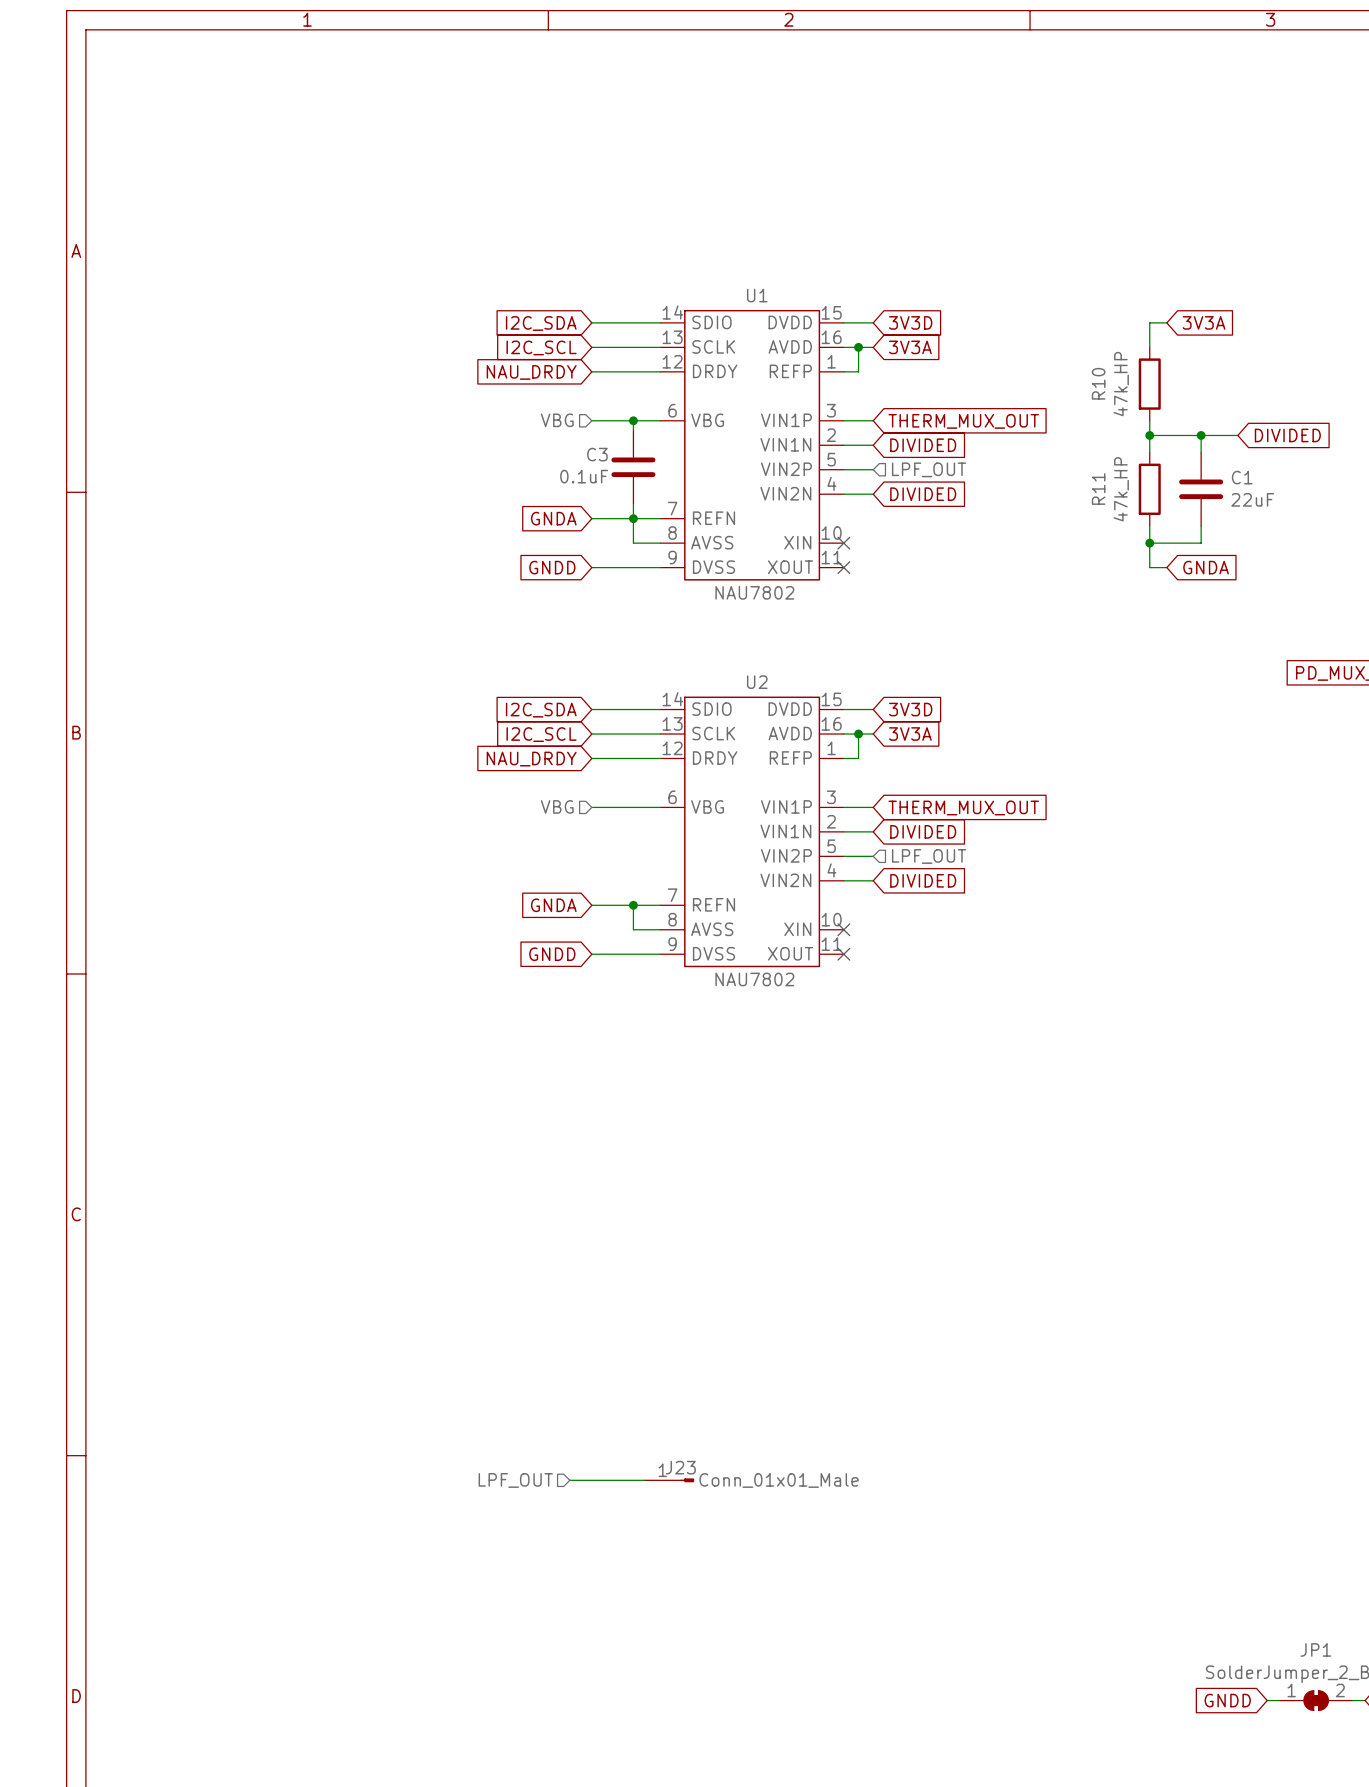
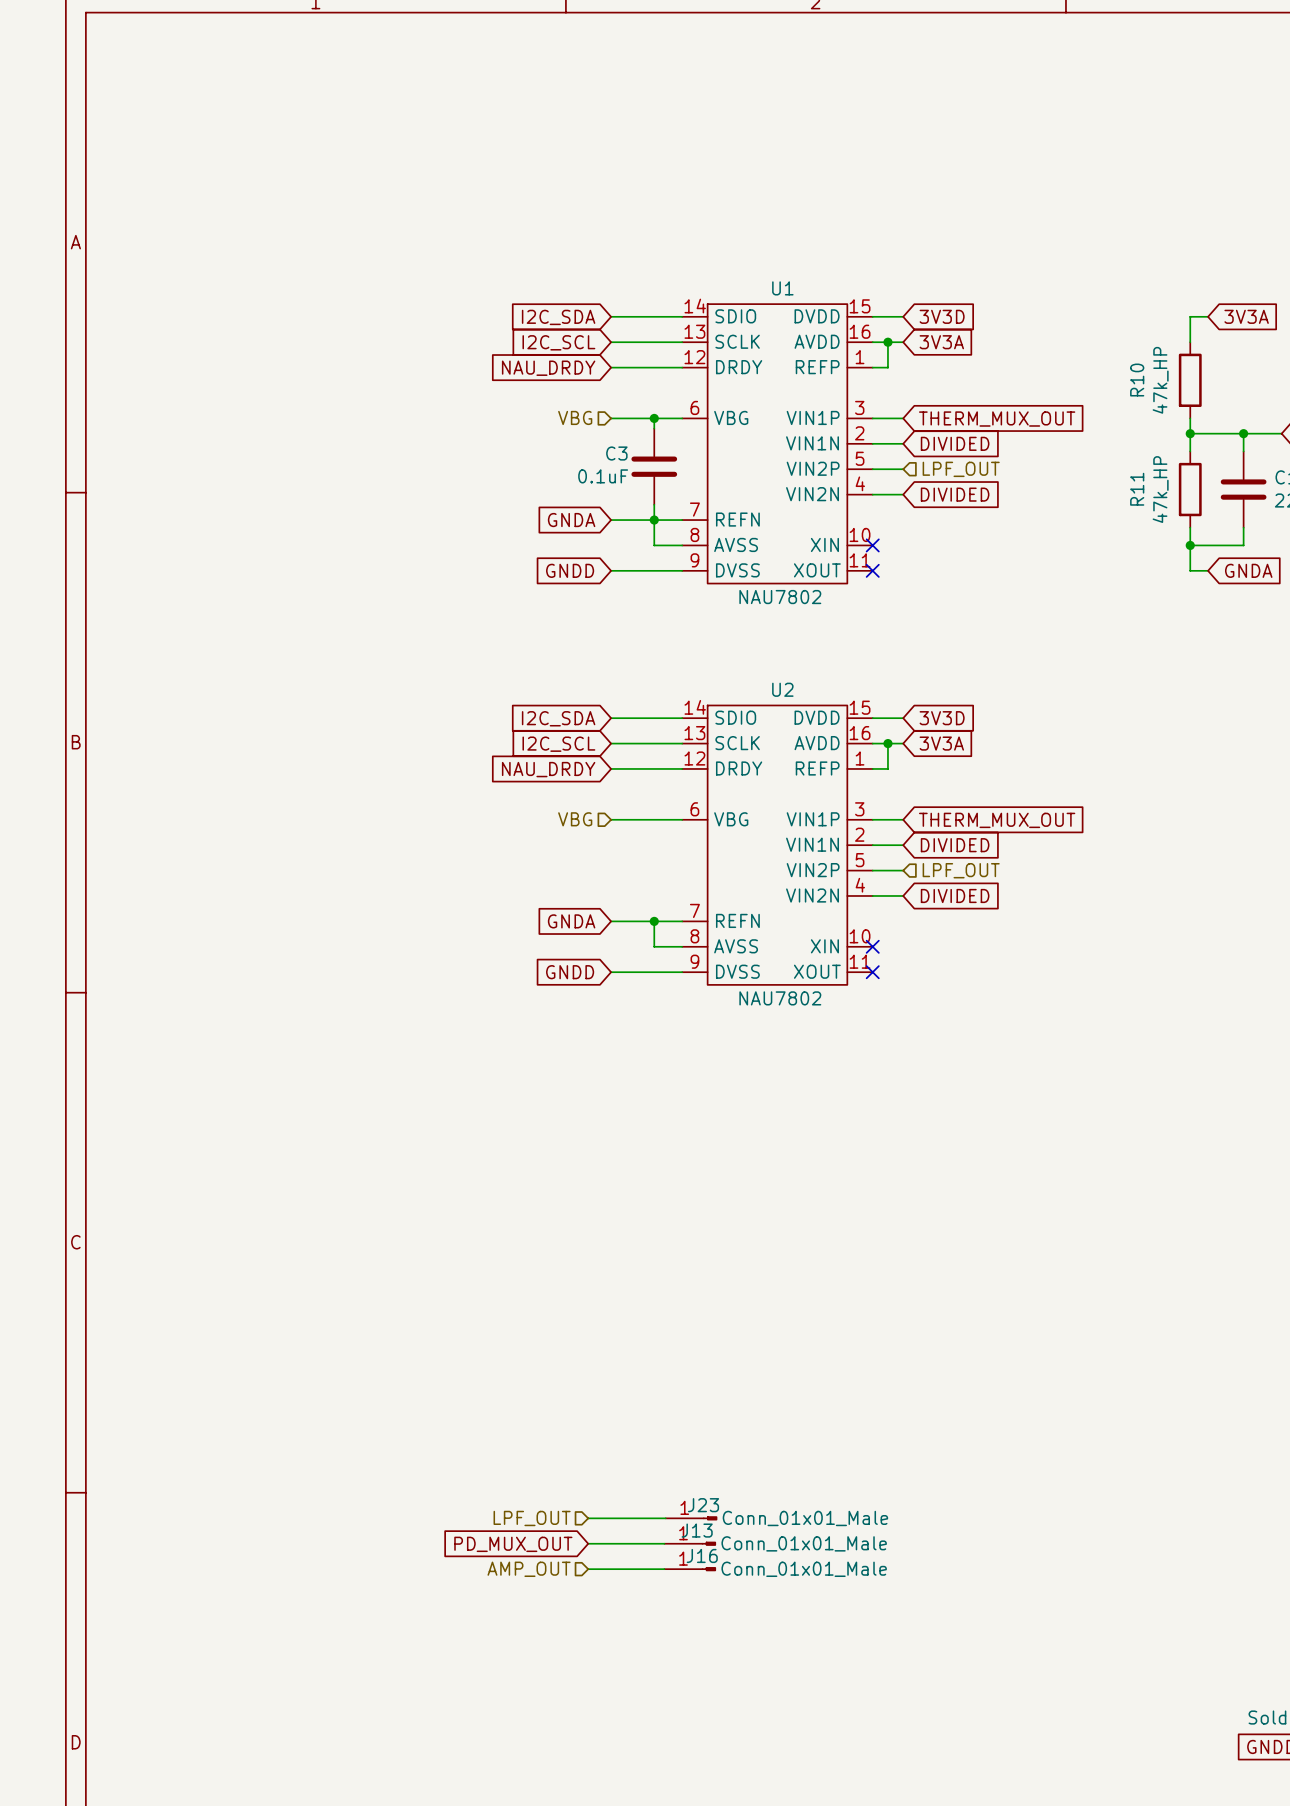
wire: none -> (588, 1543) (664, 1543)
J13: none -> Conn_01x01_Male (690, 1543)
global label: none -> PD_MUX_OUT (513, 1544)
hierarchical label: none -> AMP_OUT (529, 1569)
wire: none -> (588, 1569) (664, 1569)
J16: none -> Conn_01x01_Male (690, 1569)

